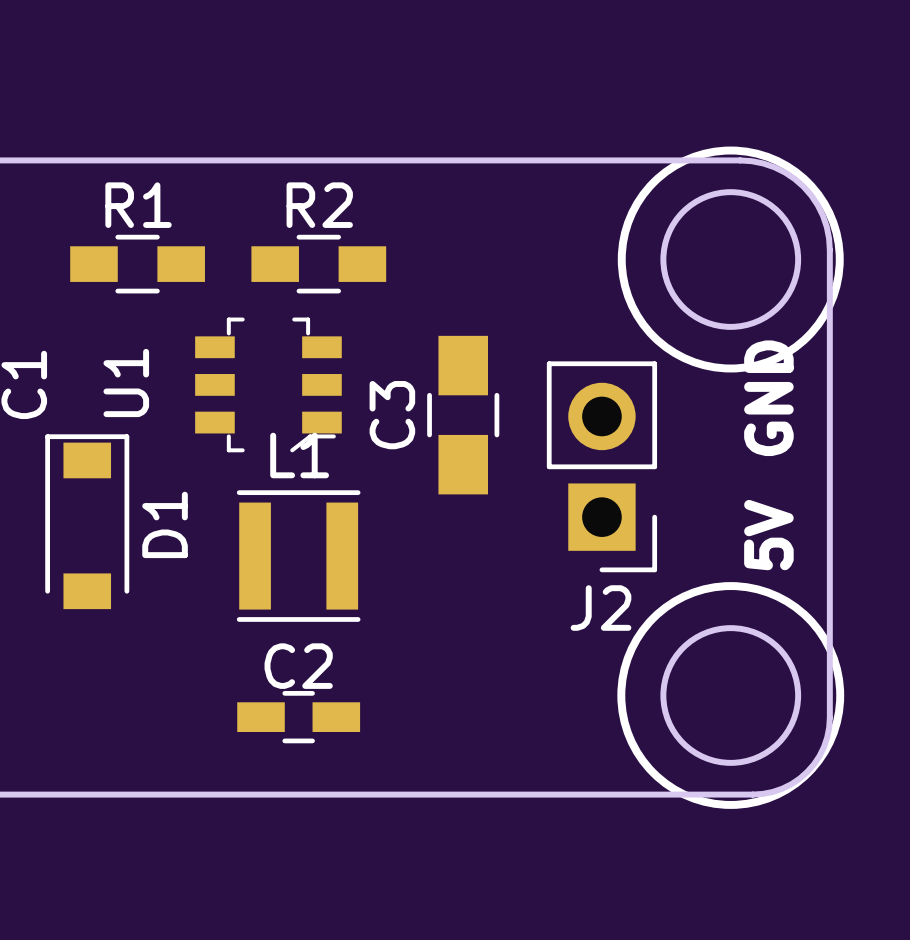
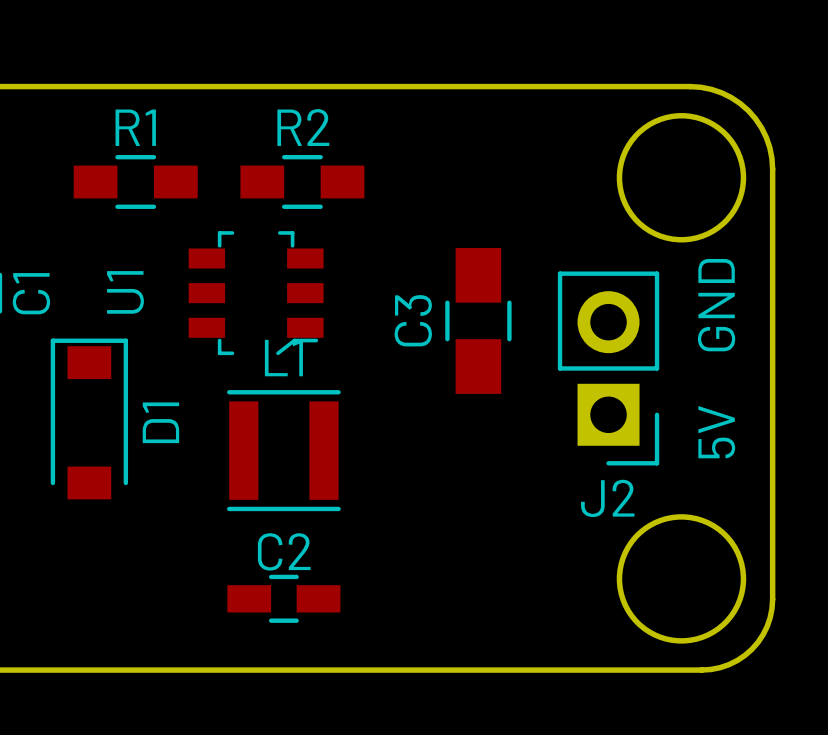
drawing: [617, 146, 844, 373] -> none
C3 position: (463, 415) -> (478, 320)
J2 position: (601, 466) -> (608, 368)
drawing: [617, 582, 845, 809] -> none

